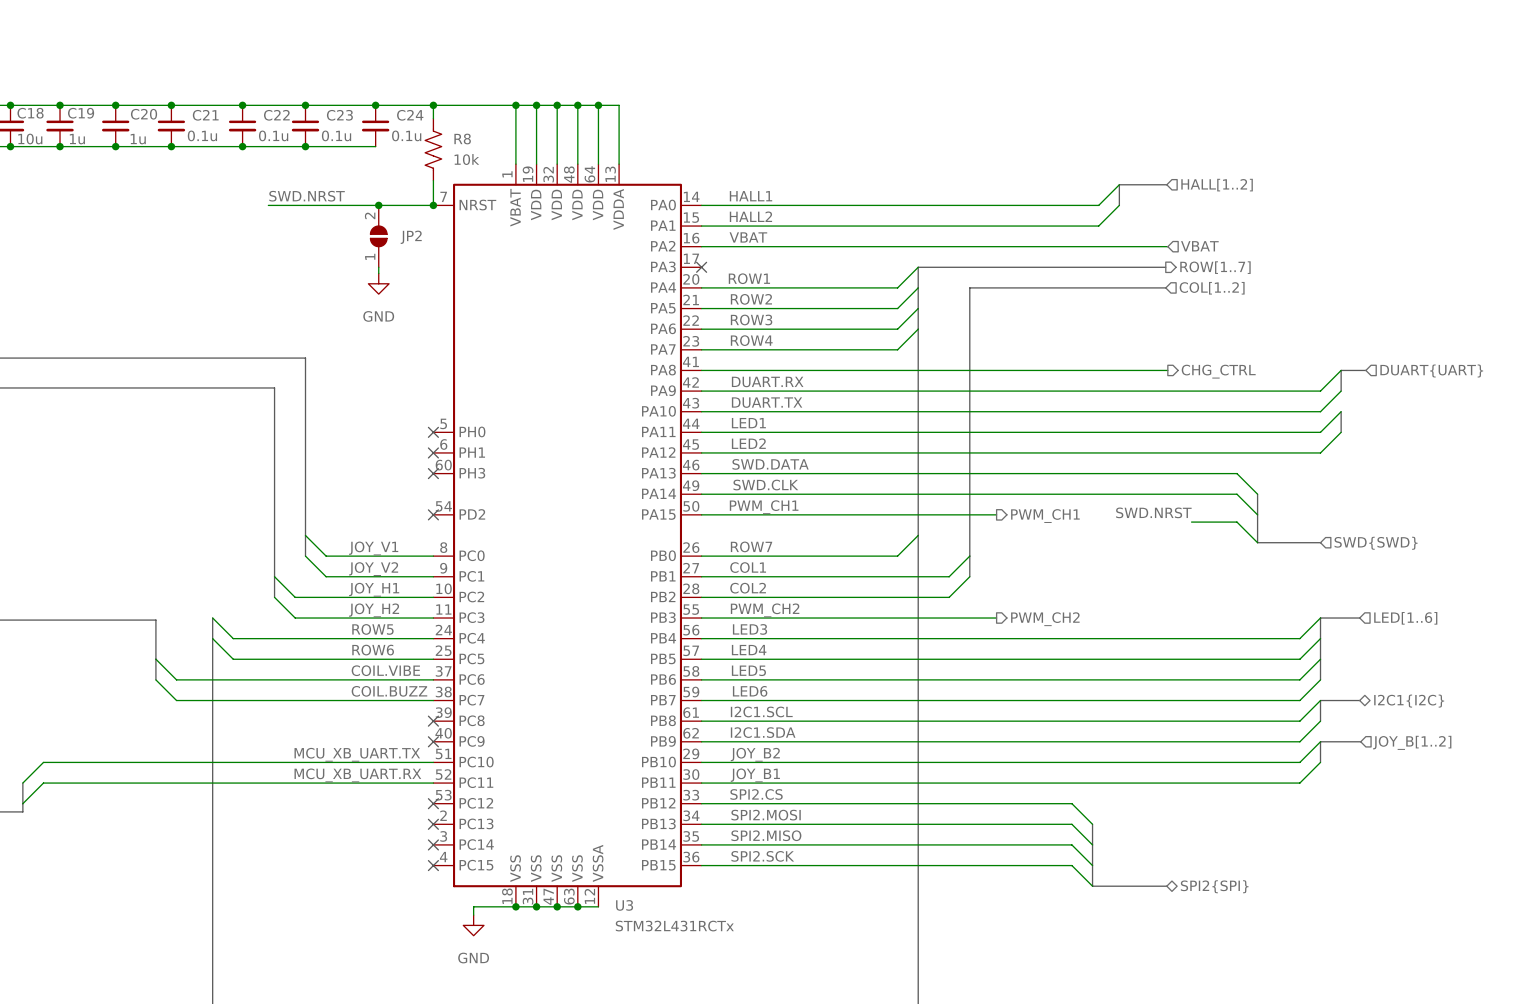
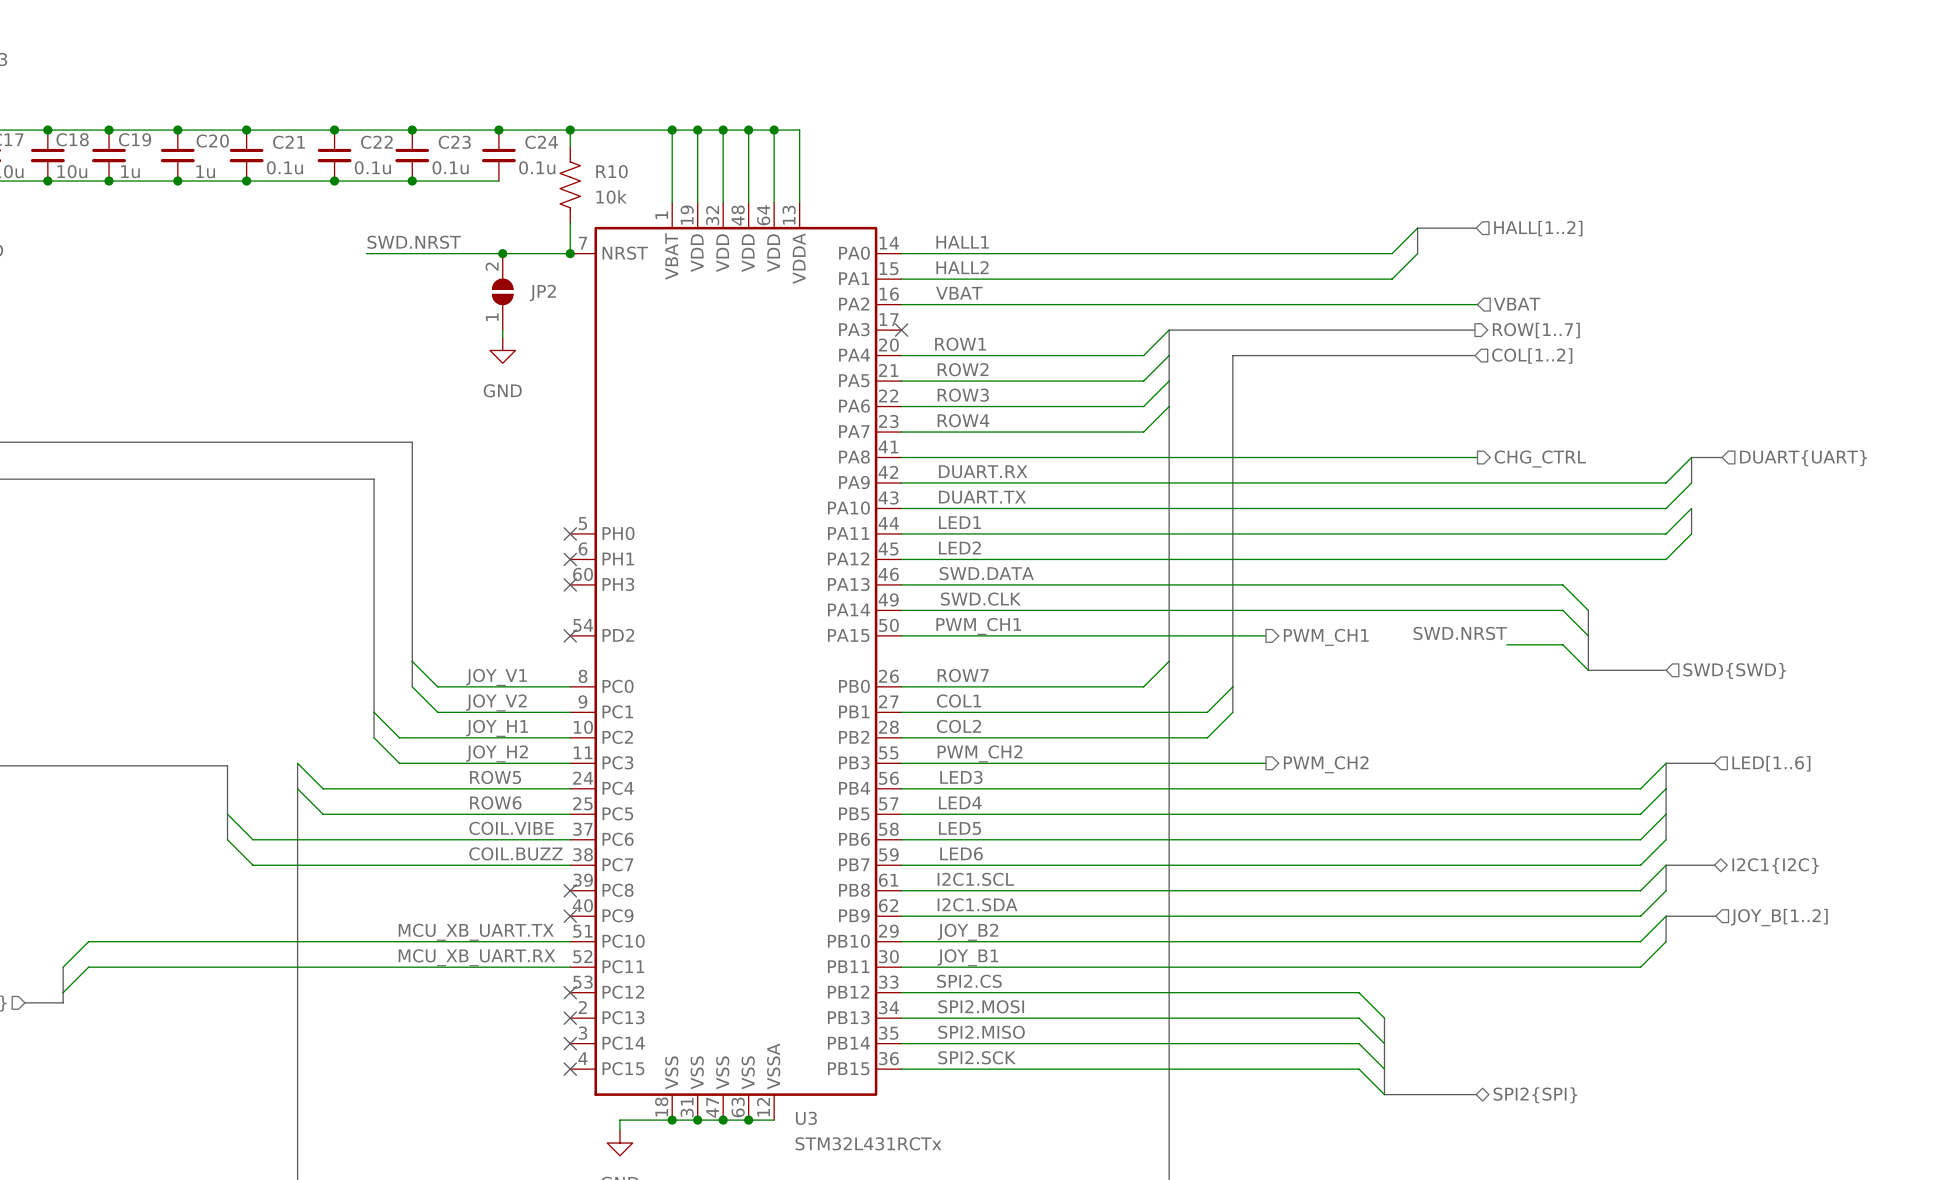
R8 name: R8 (462, 139) -> R10 (611, 171)

